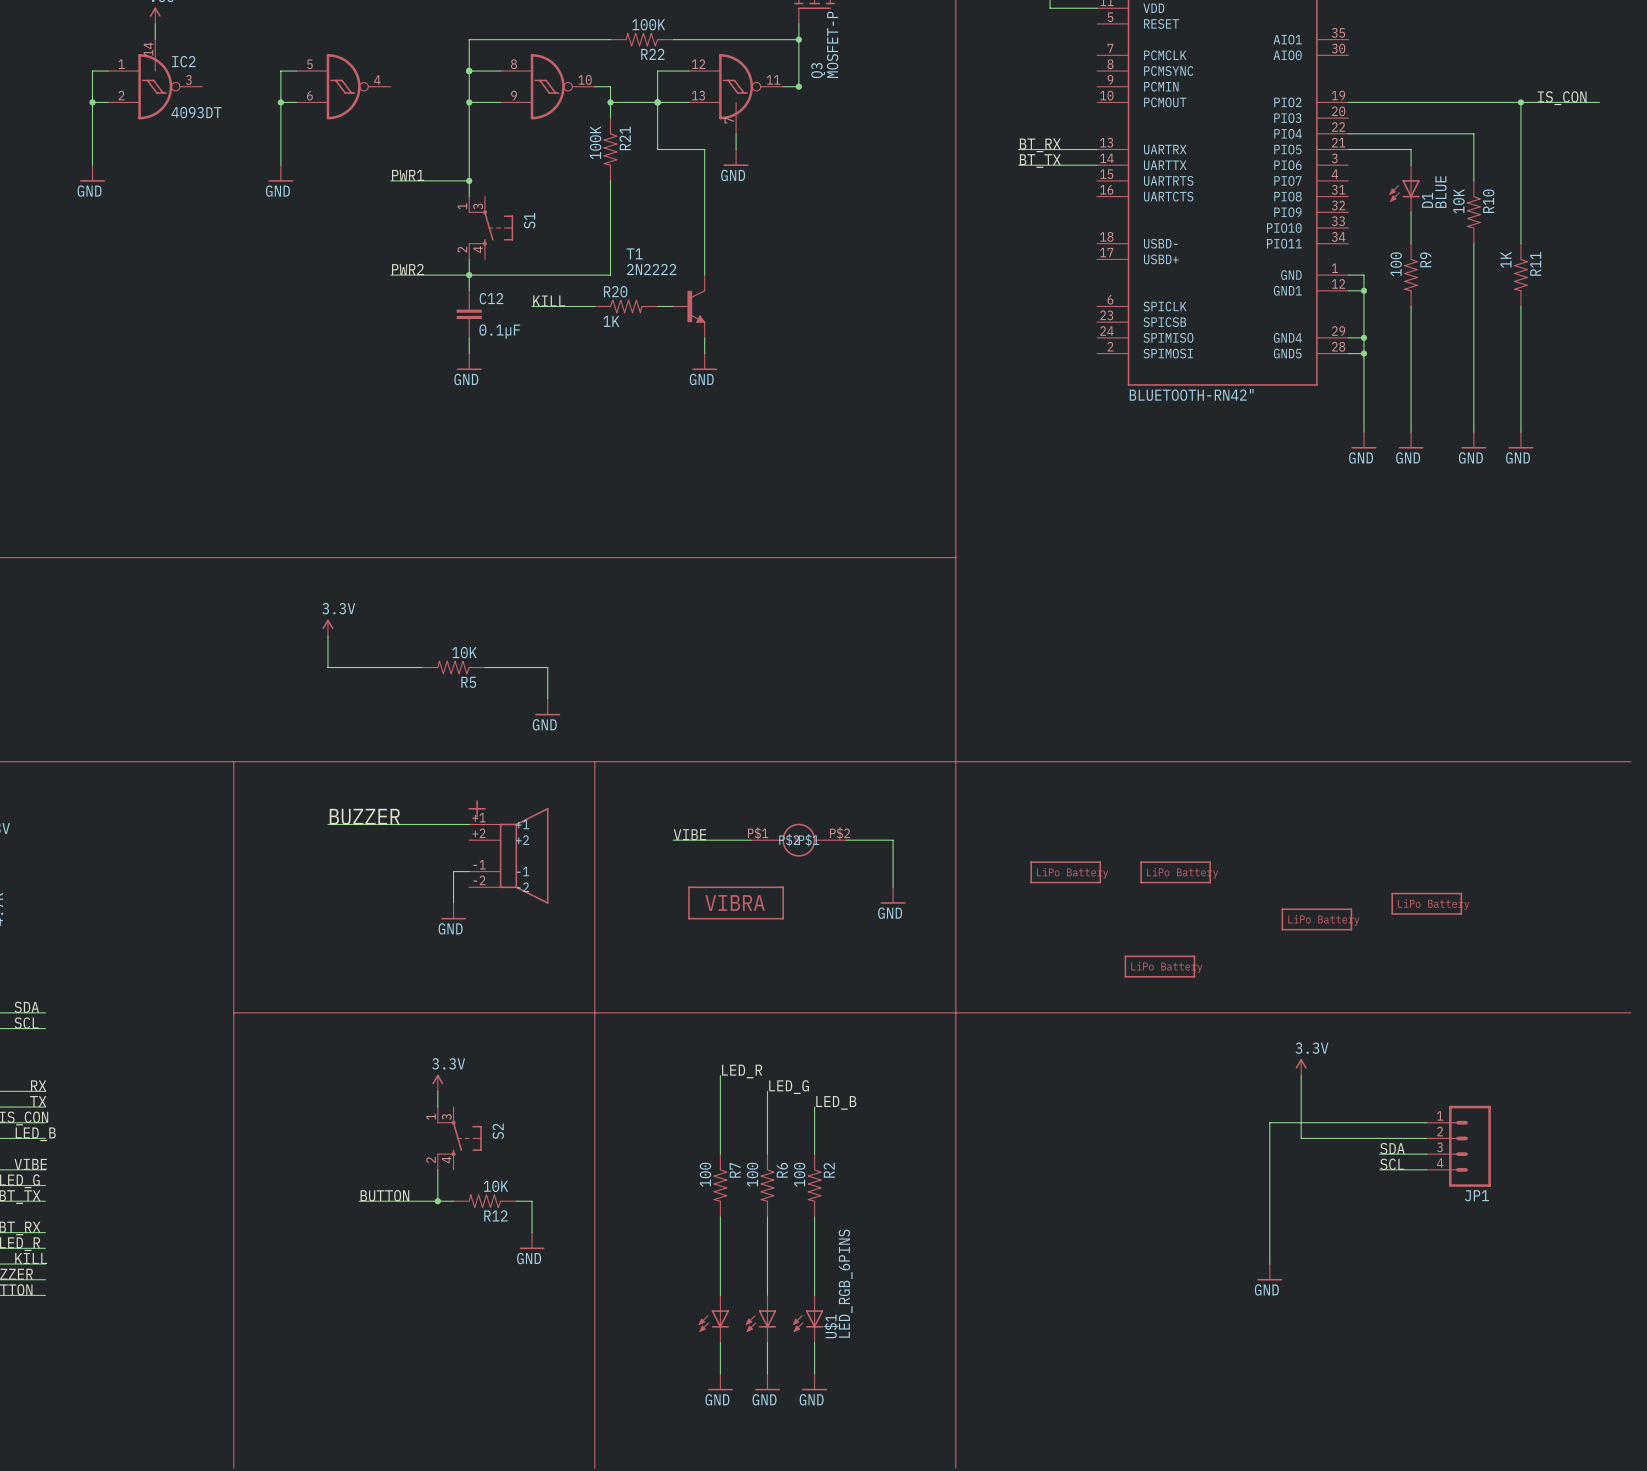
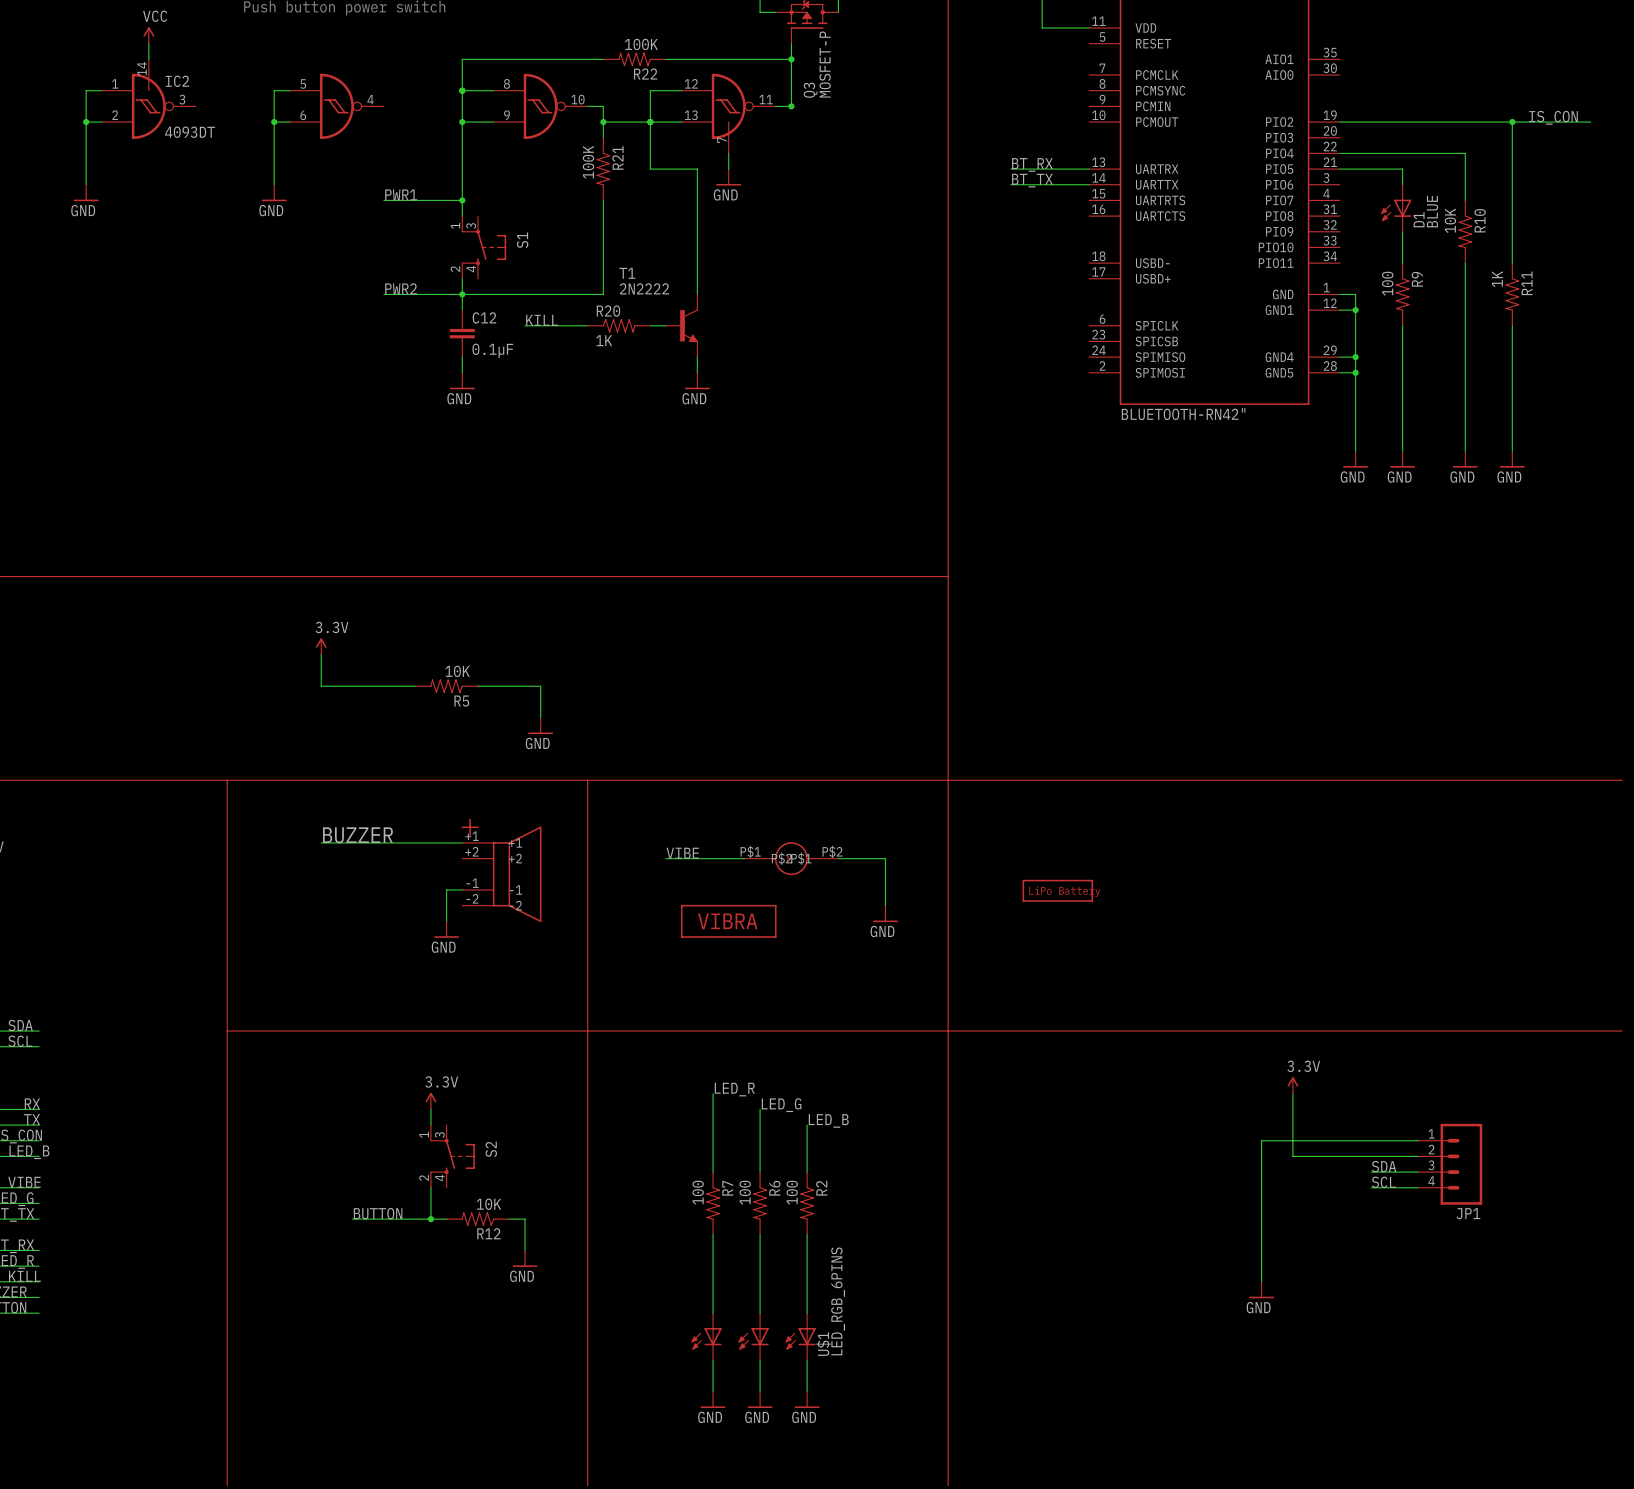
part: (1175, 872) -> none
part: (1426, 903) -> none
part: (1316, 919) -> none
part: (1159, 966) -> none

